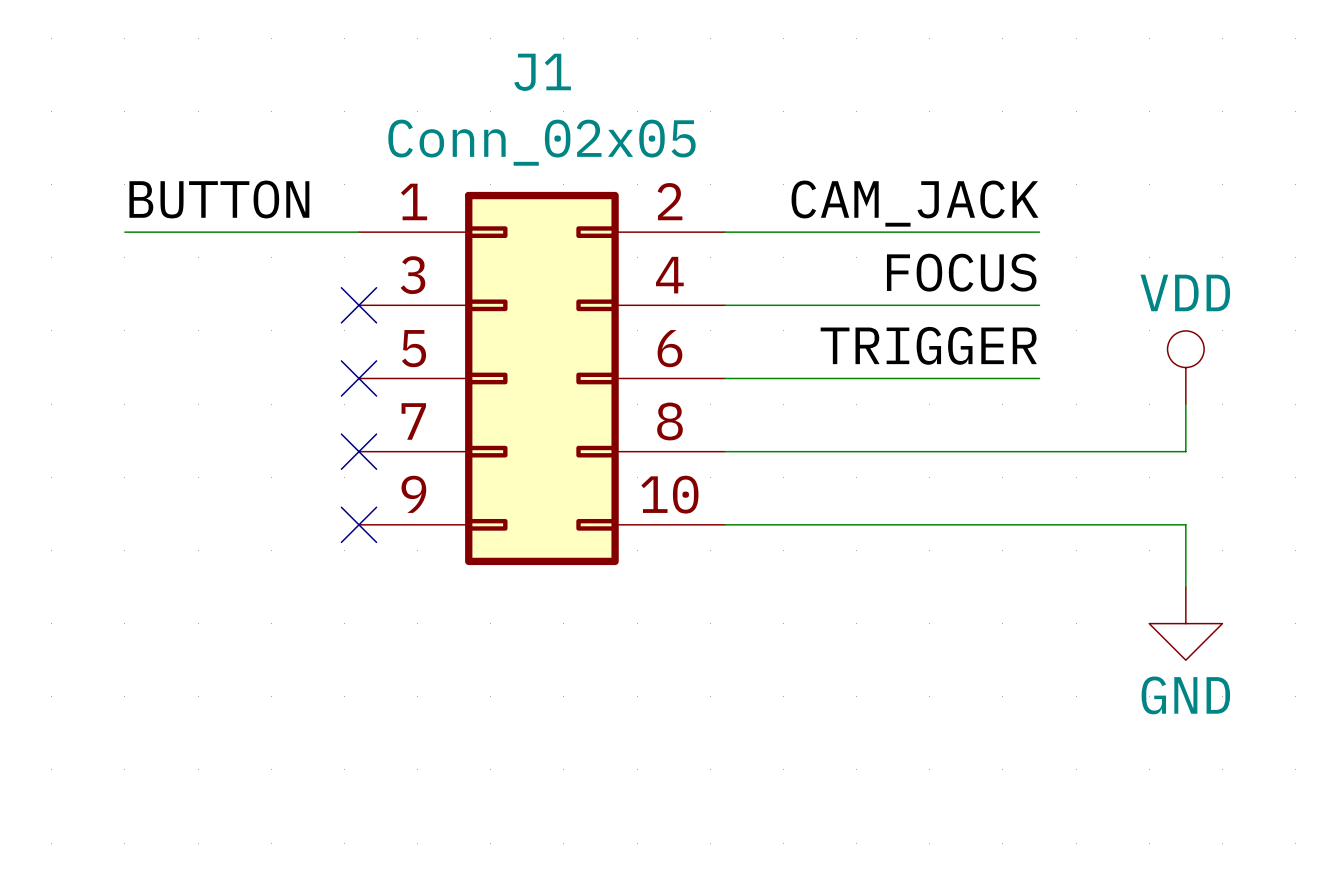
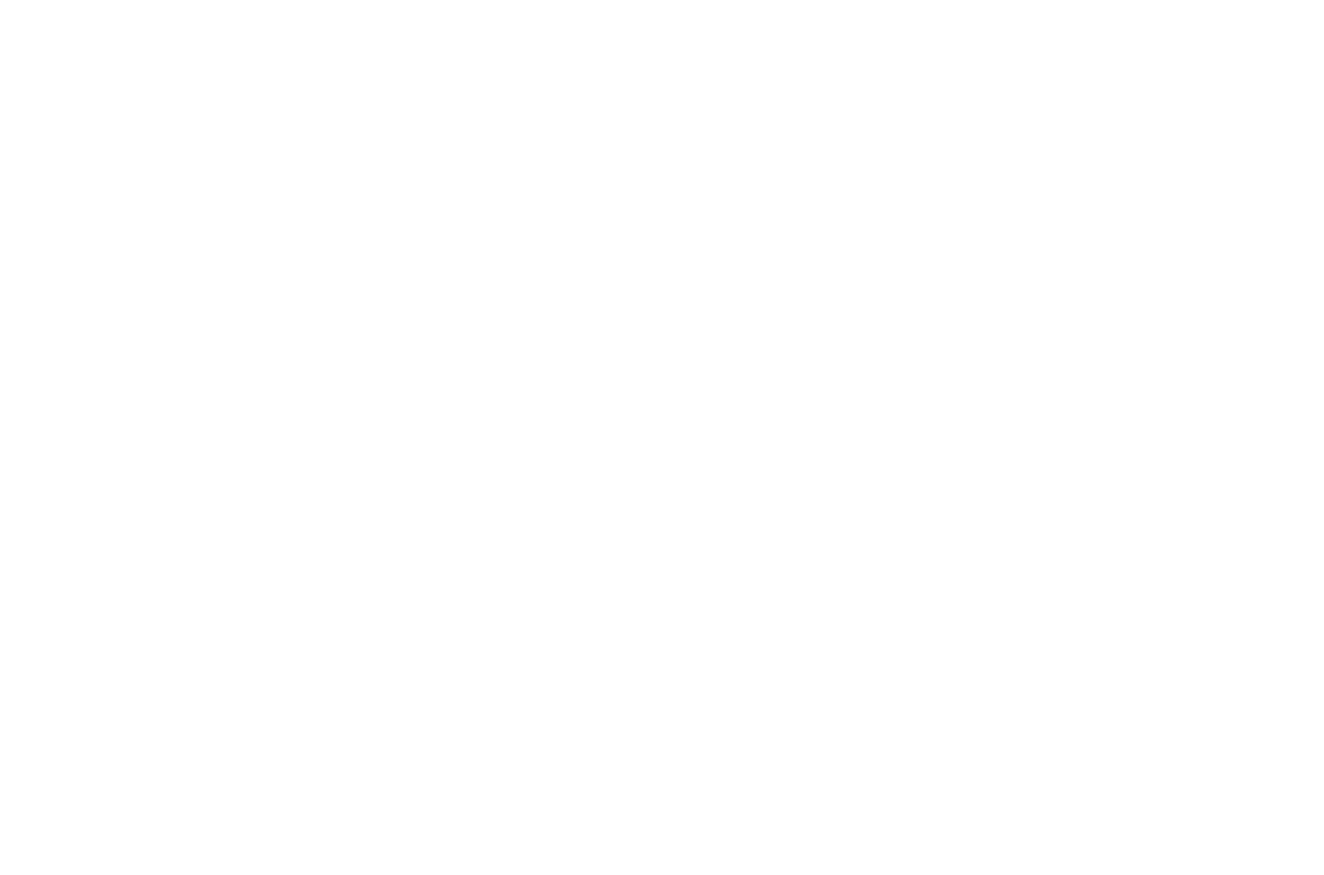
label: BUTTON (219, 199) -> none
label: CAM_JACK (914, 203) -> none
wire: (124, 232) (358, 232) -> none
wire: (724, 232) (1039, 232) -> none
label: FOCUS (961, 272) -> none
no-connect mark: (358, 305) -> none
wire: (724, 305) (1039, 305) -> none
label: TRIGGER (928, 345) -> none
power symbol: VDD (1185, 367) -> none
no-connect mark: (358, 378) -> none
J1: Conn_02x05 (541, 378) -> none
wire: (724, 378) (1039, 378) -> none
wire: (1185, 404) (1185, 451) (724, 451) -> none
no-connect mark: (358, 451) -> none
no-connect mark: (358, 524) -> none
wire: (724, 524) (1185, 524) (1185, 587) -> none
power symbol: GND (1185, 623) -> none

